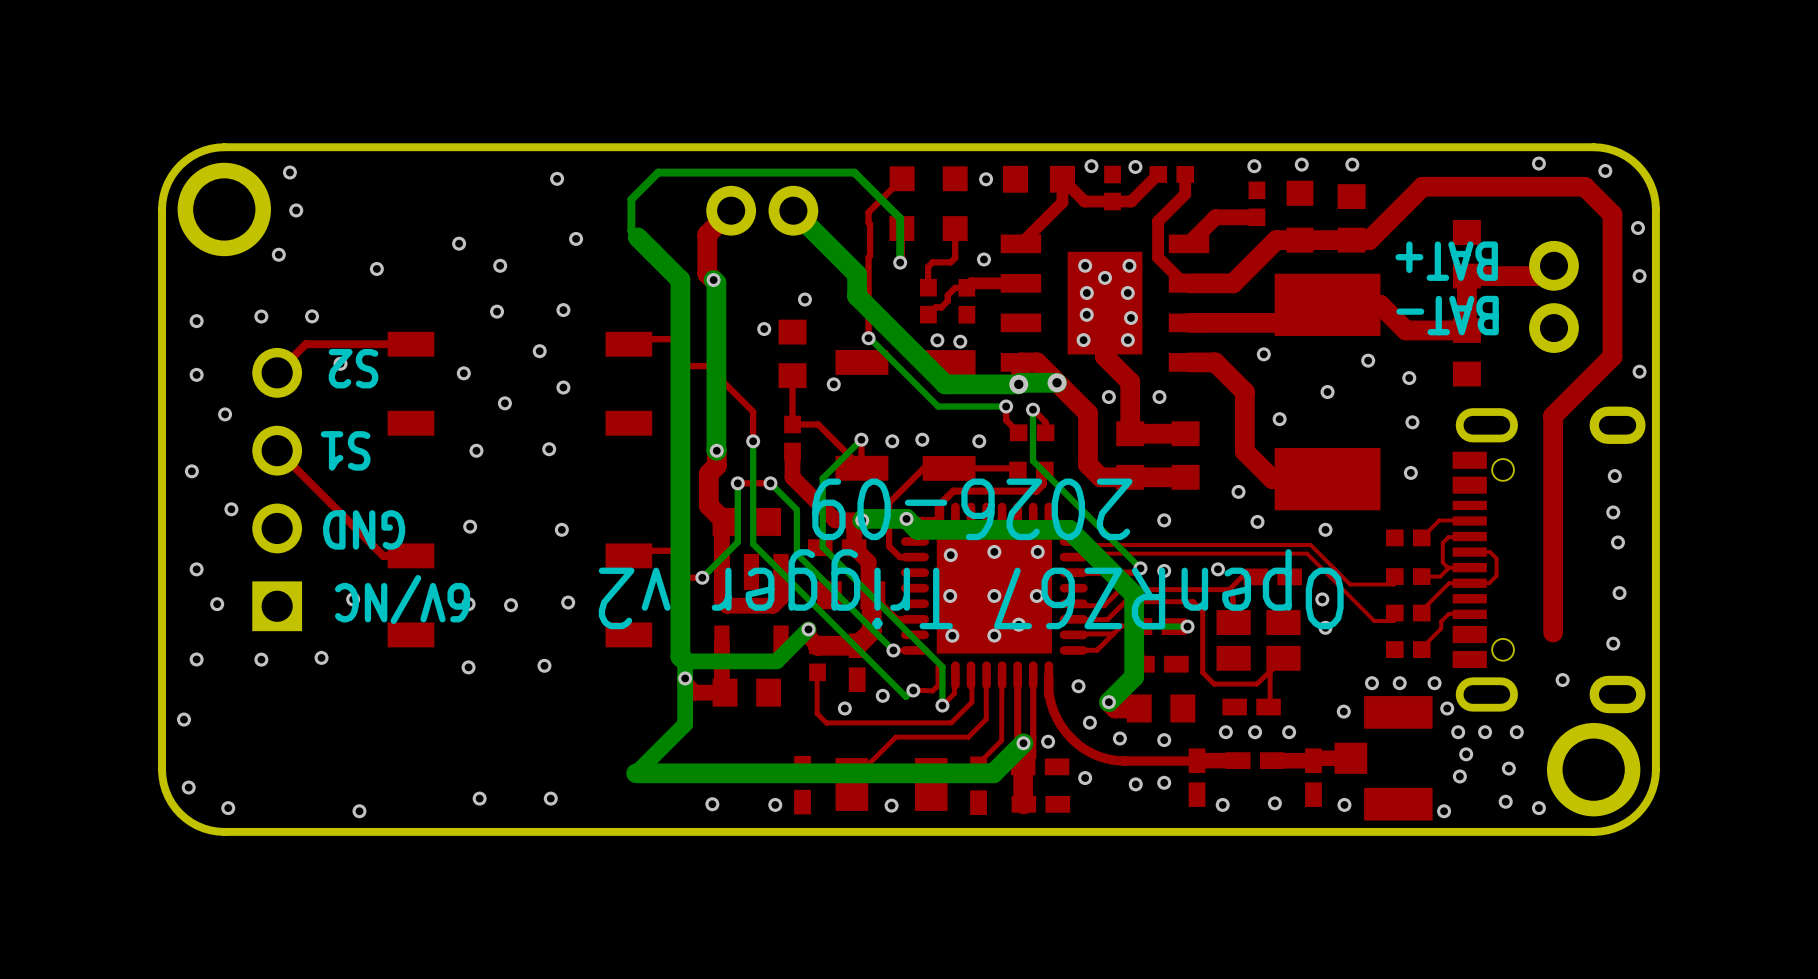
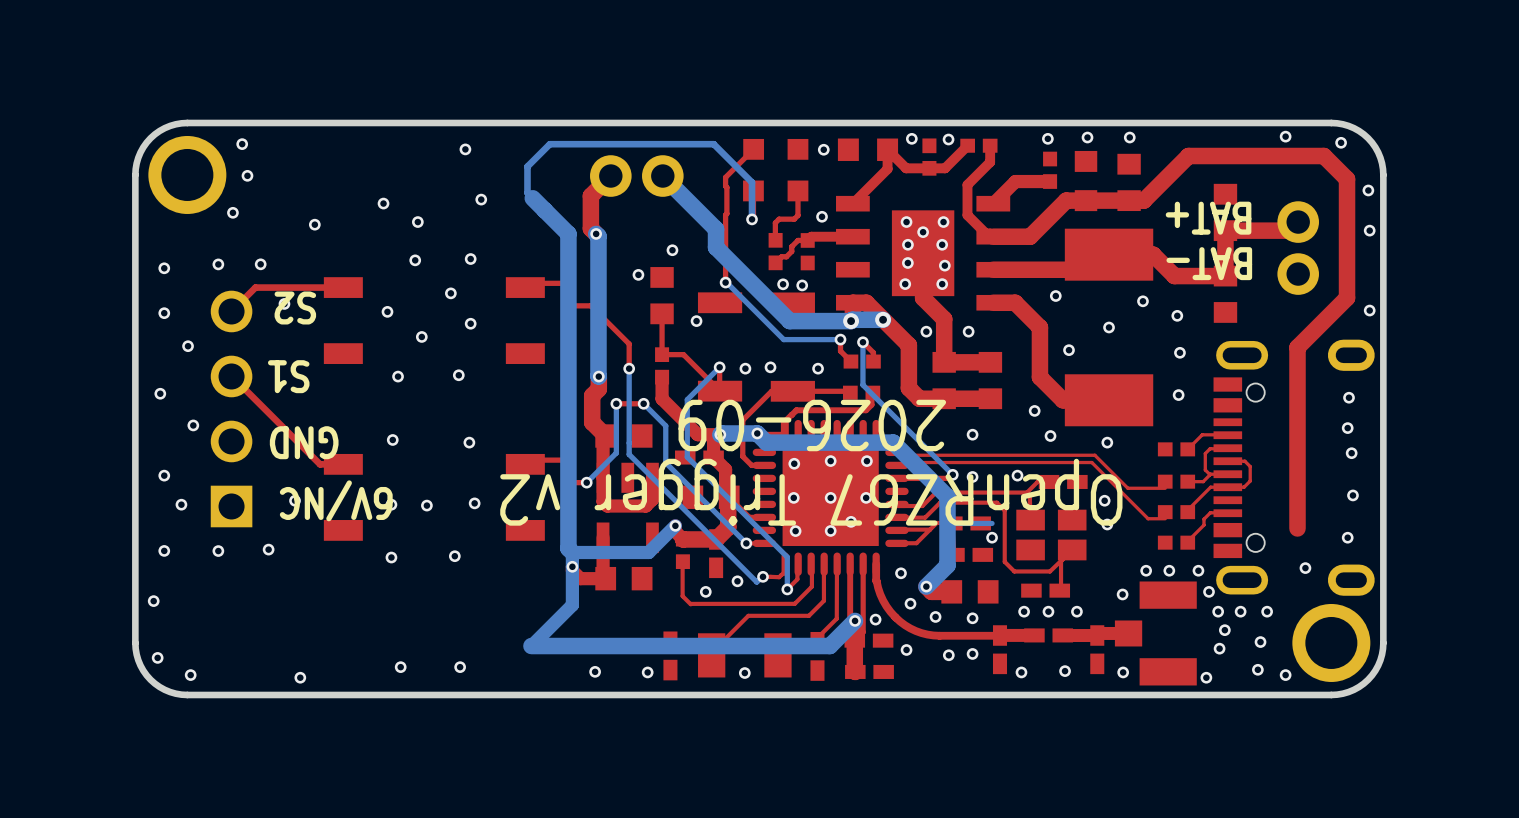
via position: (1187, 626) -> (992, 537)

